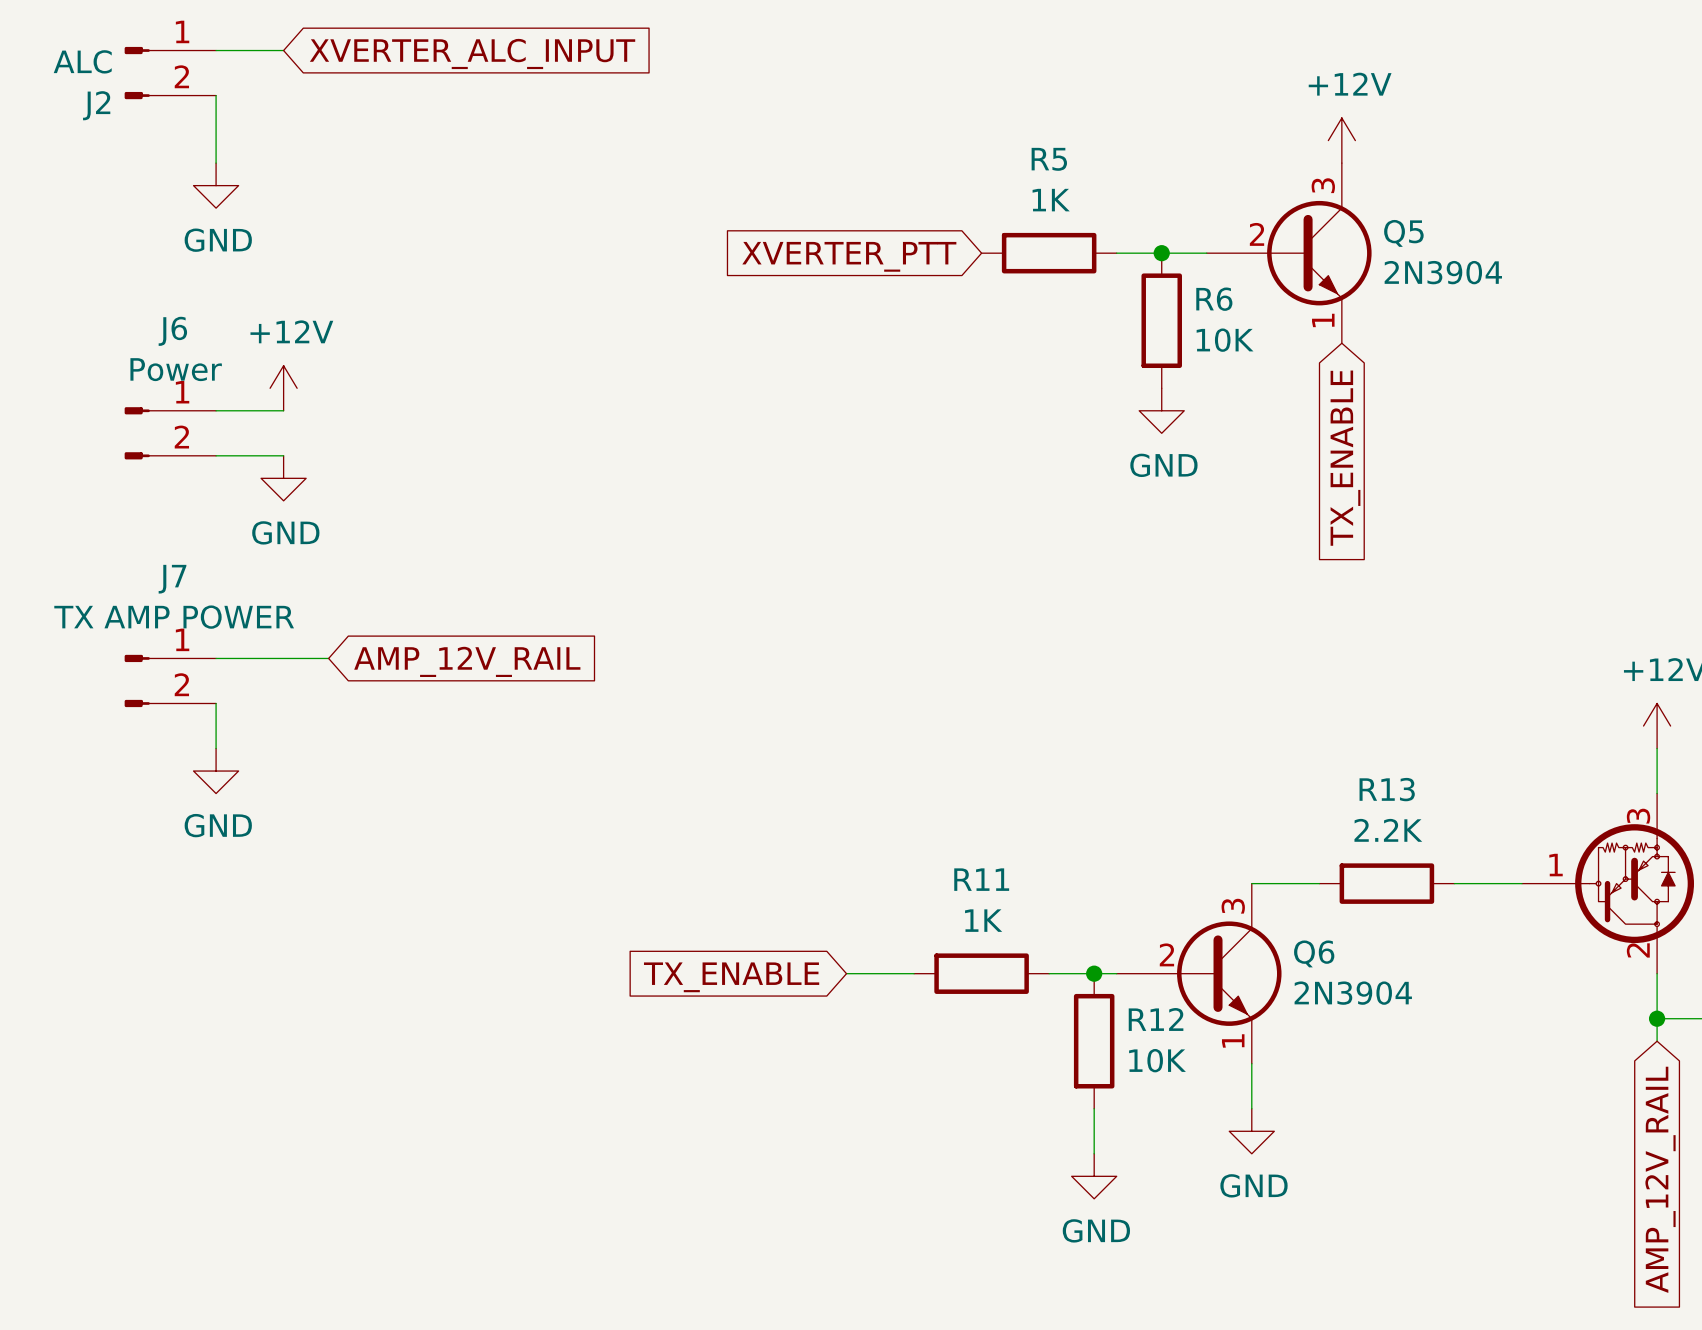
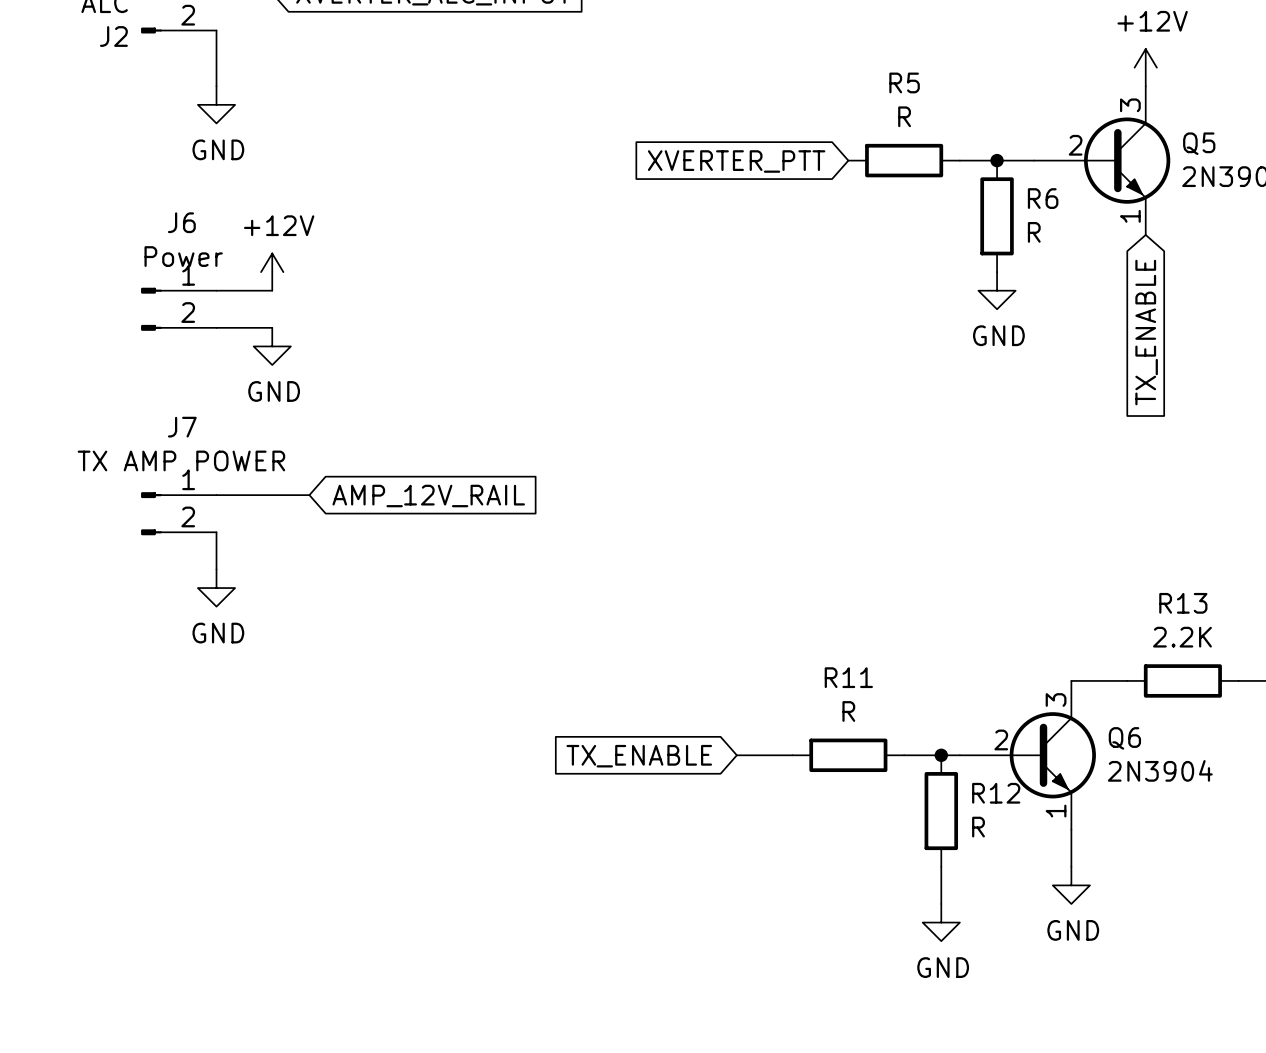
R5 value: 1K (1051, 200) -> R (904, 116)
R6 value: 10K (1225, 340) -> R (1034, 232)
R11 value: 1K (983, 920) -> R (848, 711)
R12 value: 10K (1157, 1060) -> R (978, 827)

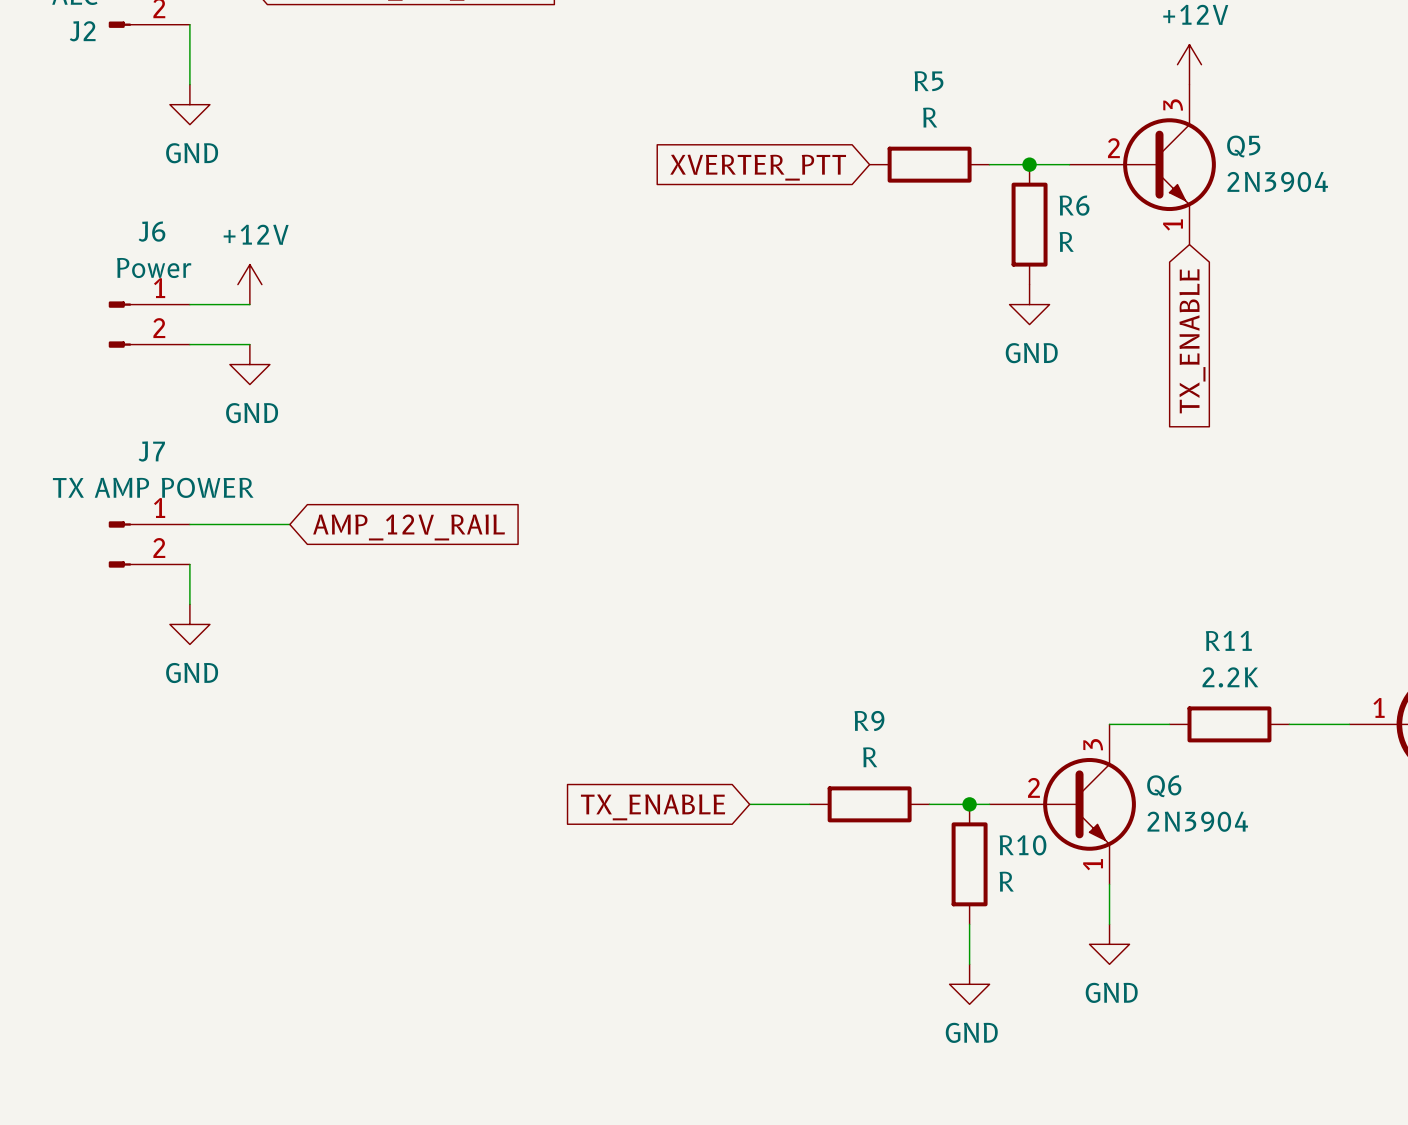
R13 name: R13 (1183, 603) -> R11 (1228, 640)
R11 name: R11 (848, 677) -> R9 (869, 720)
R12 name: R12 (996, 793) -> R10 (1022, 845)

